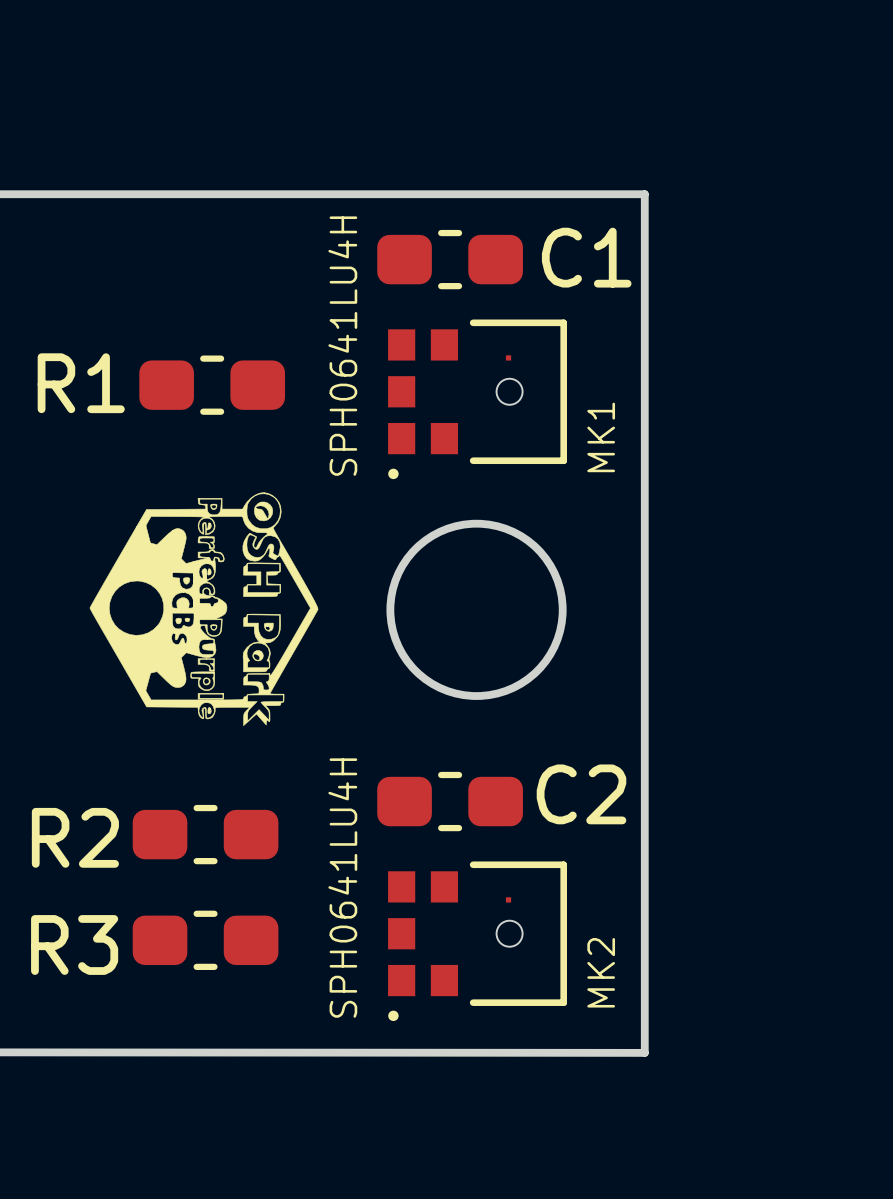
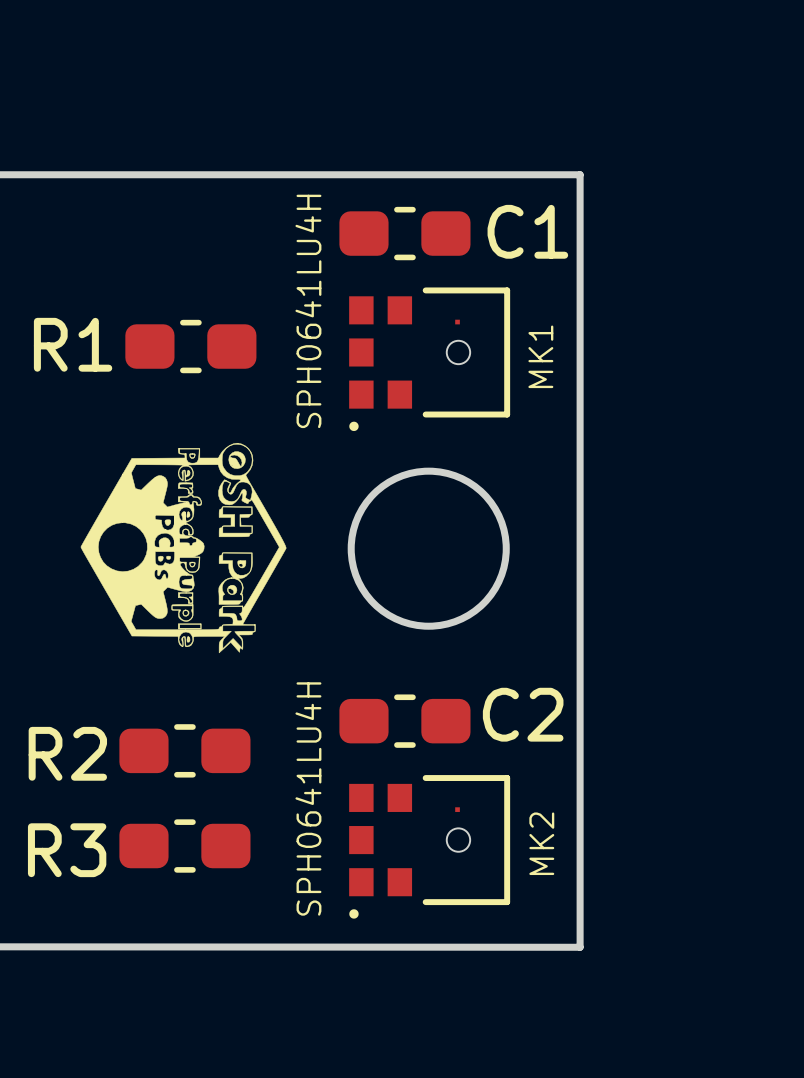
MK1 name position: MK1 (601, 437) -> MK1 (540, 356)
MK2 name position: MK2 (601, 972) -> MK2 (541, 843)

